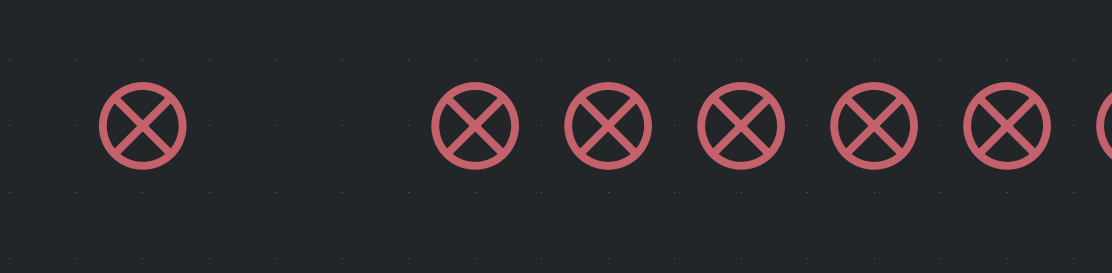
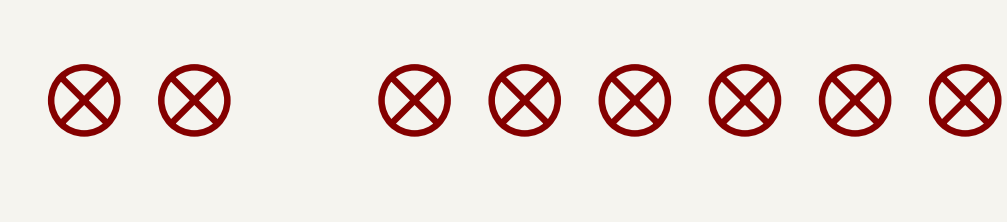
part: none -> (84, 100)
part: (142, 125) -> none
part: none -> (194, 100)

